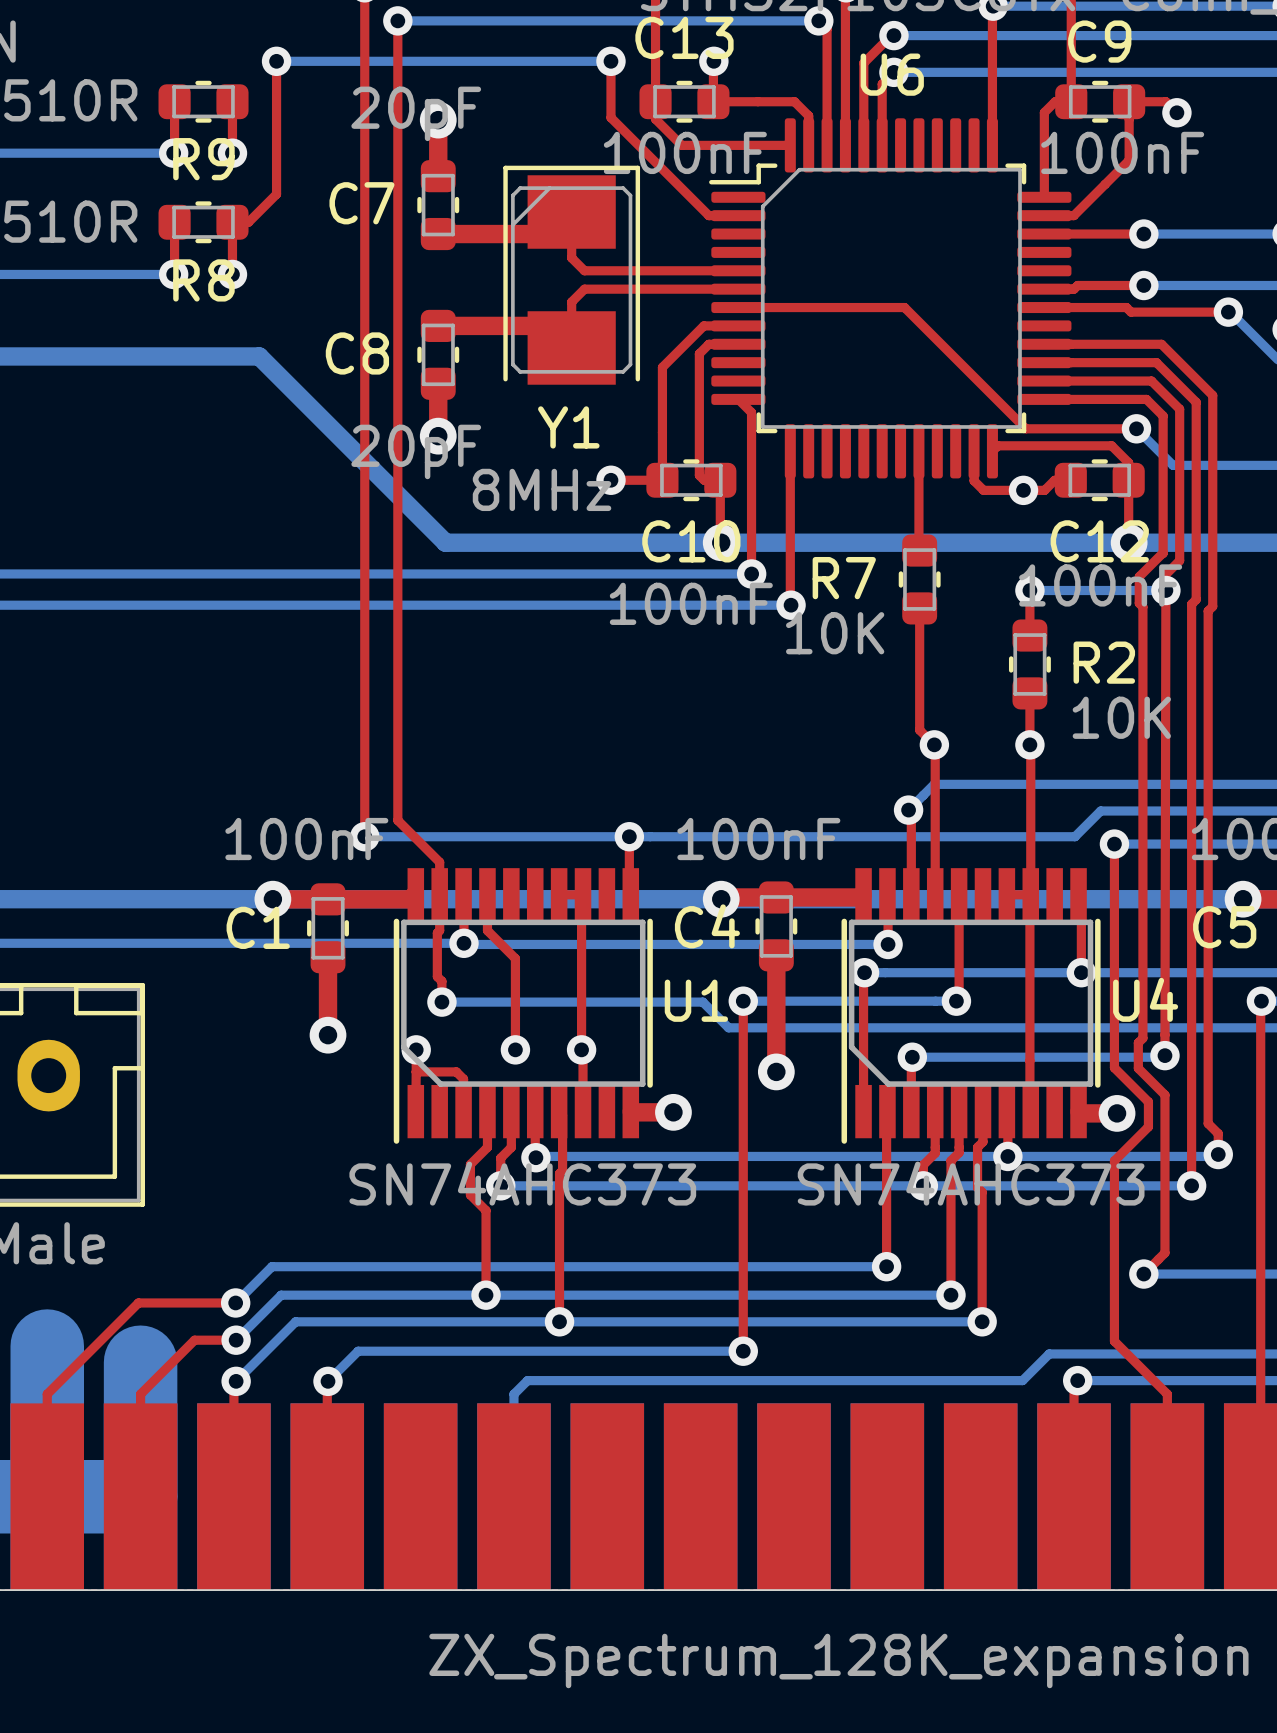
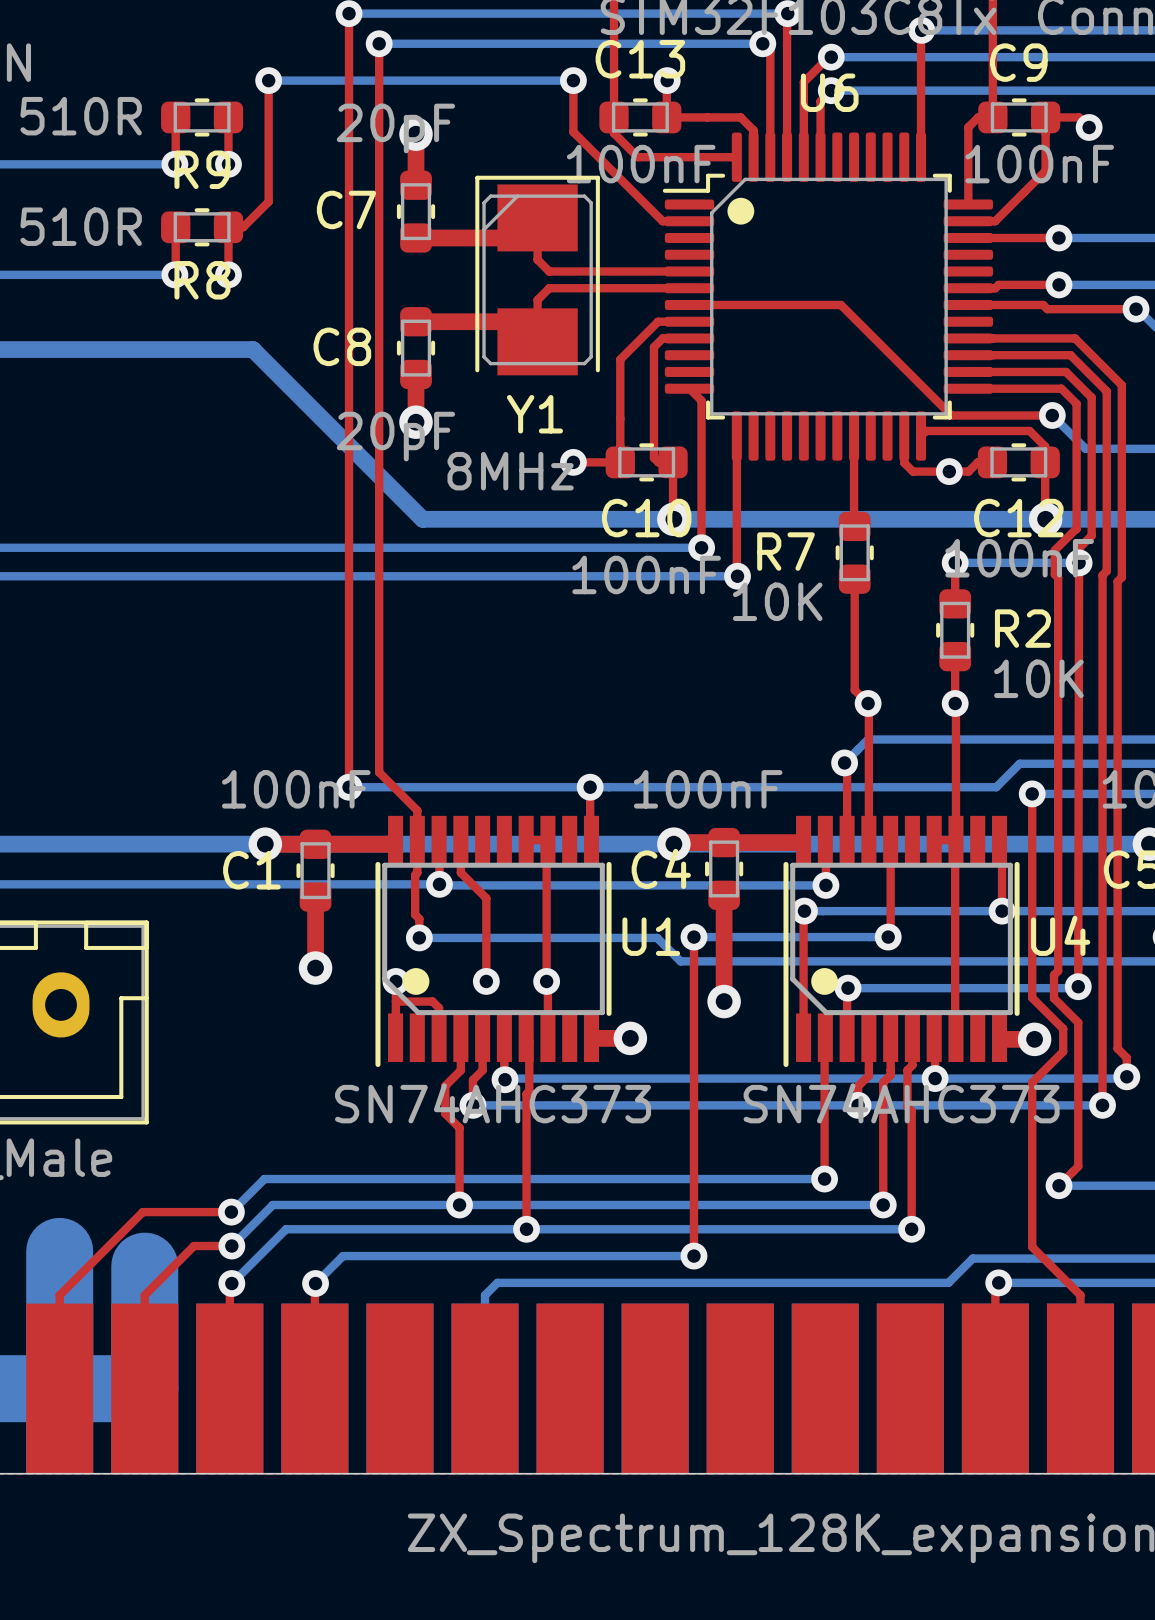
drawing: none -> [727, 197, 755, 225]
drawing: none -> [402, 968, 430, 995]
drawing: none -> [811, 968, 838, 995]

